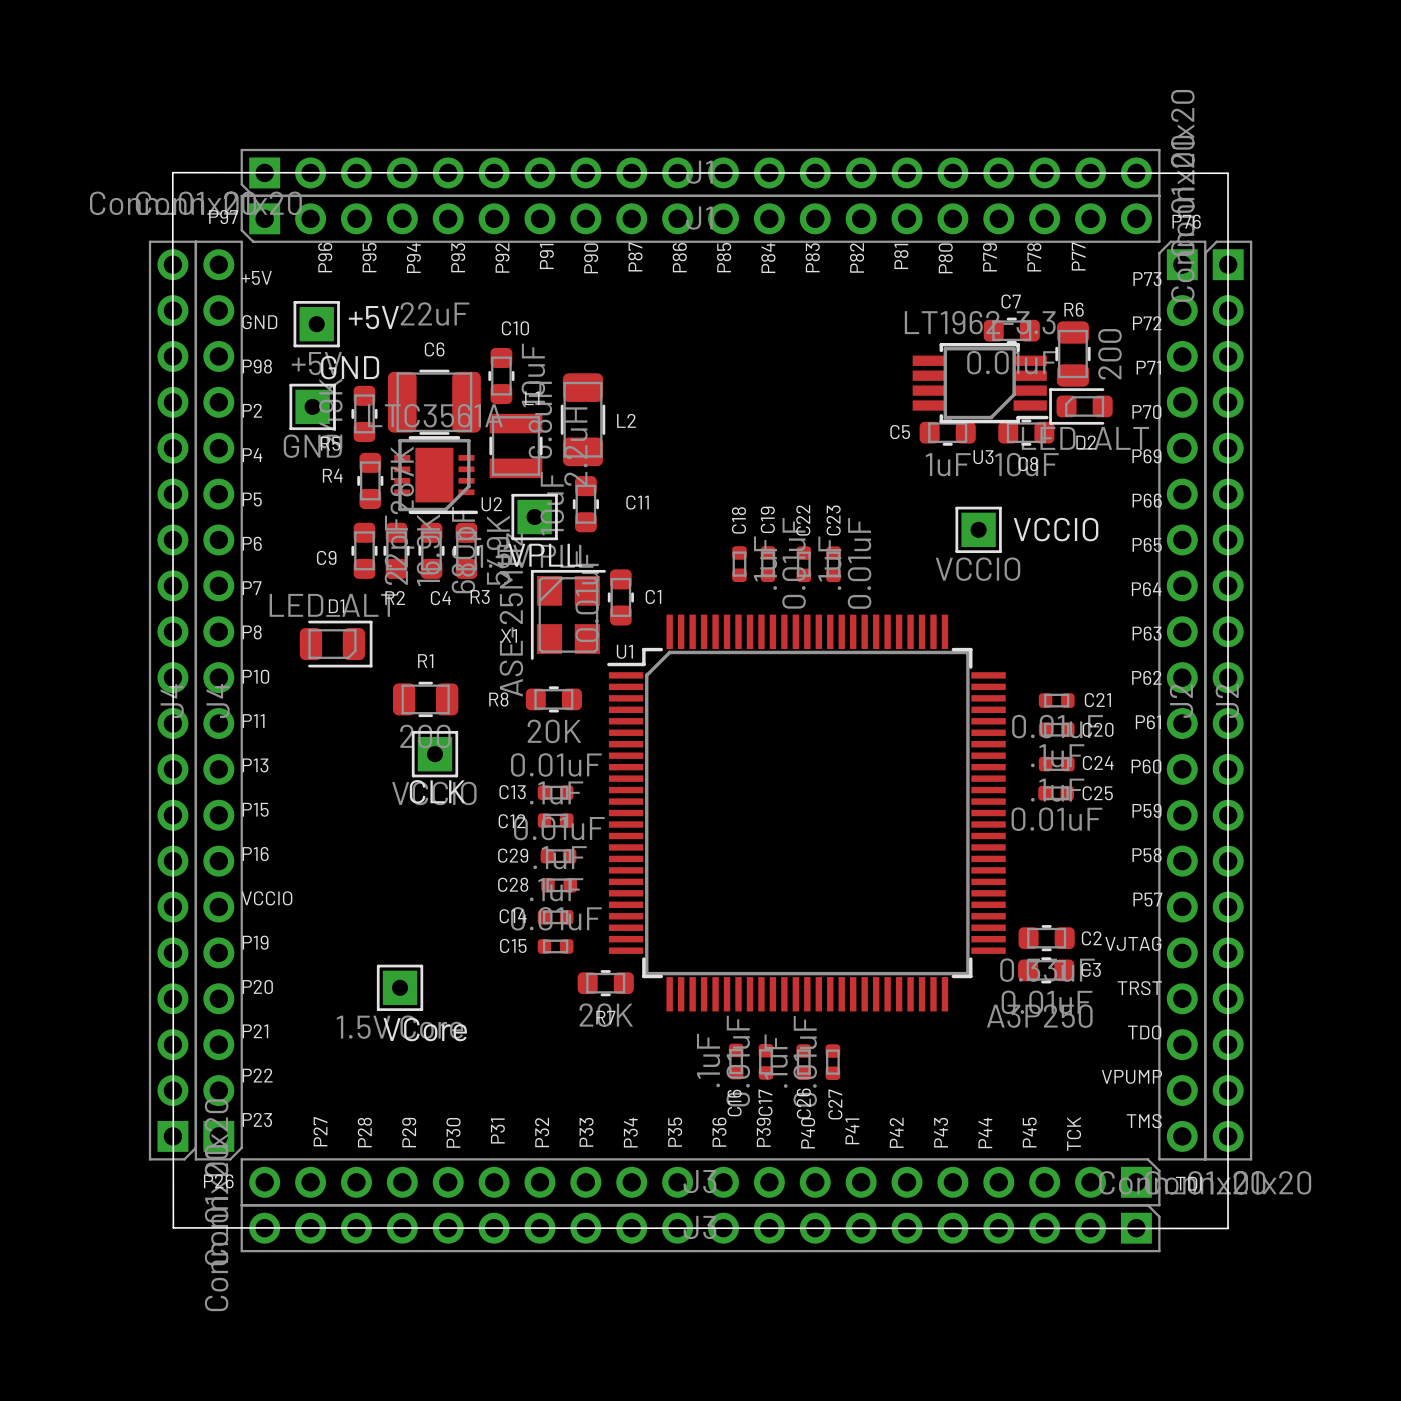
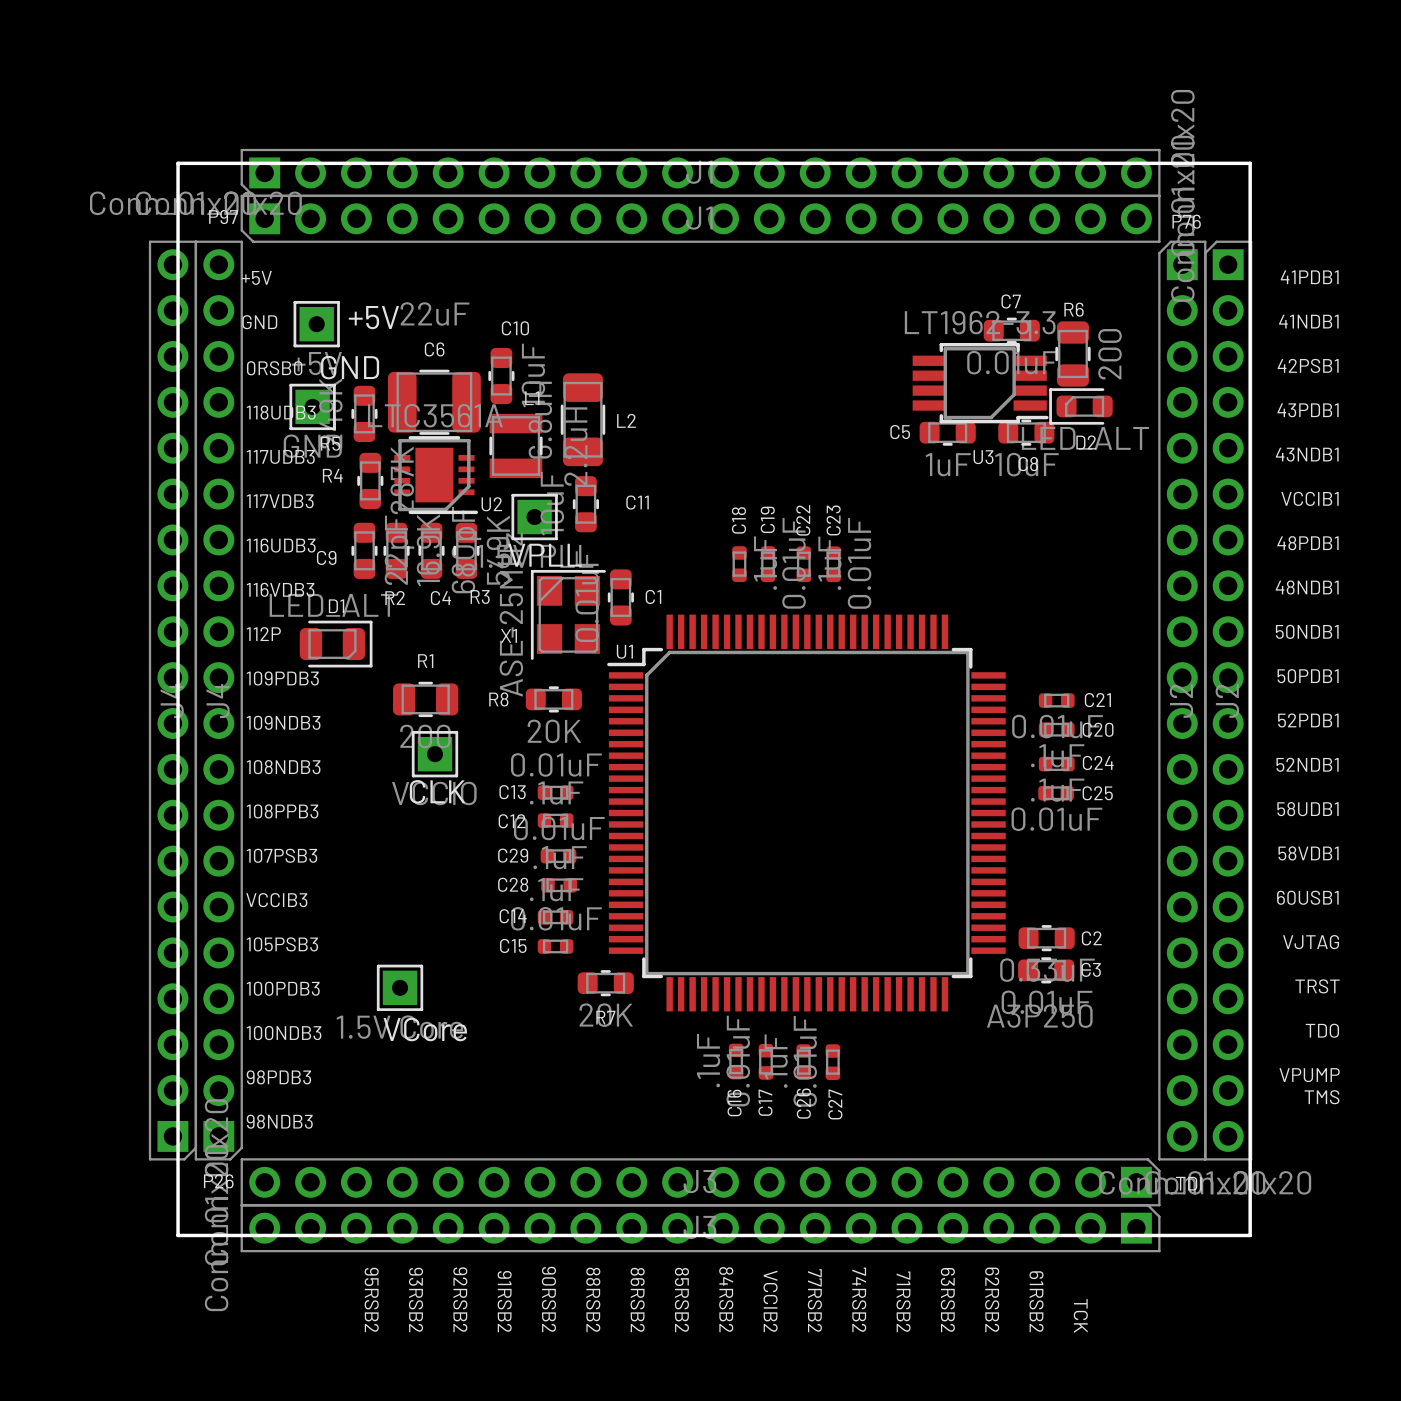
board edge: (172, 172) (173, 1227) (1228, 1228) (1228, 173) (172, 172) -> (178, 163) (178, 1235) (1250, 1235) (1250, 163) (178, 163)
text: P91 (546, 256) -> none
text: P87 (635, 256) -> none
text: P81 (901, 256) -> none
text: P77 (1078, 256) -> none
text: P96 (325, 257) -> none
text: P95 (369, 257) -> none
text: P93 (458, 257) -> none
text: P92 (502, 257) -> none
text: P86 (679, 257) -> none
text: P85 (724, 257) -> none
text: P83 (812, 257) -> none
text: P82 (857, 257) -> none
text: P79 (990, 257) -> none
text: P78 (1034, 257) -> none
text: P94 (413, 258) -> none
text: P90 (591, 258) -> none
text: P84 (768, 258) -> none
text: P80 (945, 258) -> none
text: none -> 41PDB1 (1309, 277)
text: P73 (1147, 279) -> none
text: none -> 41NDB1 (1308, 321)
text: P72 (1147, 323) -> none
text: none -> 42PSB1 (1308, 365)
text: P98 (257, 366) -> 0RSB0 (274, 368)
text: P71 (1148, 367) -> none
text: P2 (252, 410) -> 118UDB3 (281, 412)
text: none -> 43PDB1 (1308, 410)
text: P70 (1146, 411) -> none
text: none -> 43NDB1 (1307, 454)
text: P4 (252, 455) -> 117UDB3 (280, 456)
text: P69 (1146, 456) -> none
text: none -> VCCIB1 (1310, 498)
text: P5 (252, 499) -> 117VDB3 (280, 501)
text: P66 (1147, 500) -> none
VCCIO: VCCIO (978, 529) -> none
text: P6 (252, 543) -> 116UDB3 (281, 545)
text: none -> 48PDB1 (1308, 543)
text: P65 (1147, 544) -> none
text: none -> 48NDB1 (1307, 587)
text: P7 (252, 588) -> 116VDB3 (280, 589)
text: P64 (1146, 589) -> none
text: none -> 50NDB1 (1307, 631)
text: P8 (252, 632) -> 112P (263, 634)
text: P63 (1147, 633) -> none
text: P10 (255, 676) -> 109PDB3 (282, 678)
text: none -> 50PDB1 (1308, 676)
text: P62 (1146, 677) -> none
text: none -> 52PDB1 (1308, 720)
text: P11 (253, 721) -> 109NDB3 (283, 722)
text: P61 (1148, 722) -> none
text: none -> 52NDB1 (1307, 764)
text: P13 (255, 765) -> 108NDB3 (283, 767)
text: P60 (1146, 766) -> none
text: P15 (255, 809) -> 108PPB3 (282, 811)
text: none -> 58UDB1 (1307, 809)
text: P59 (1146, 810) -> none
text: none -> 58VDB1 (1308, 853)
text: P16 (255, 854) -> 107PSB3 (281, 855)
text: P58 (1147, 855) -> none
text: none -> 60USB1 (1307, 897)
text: VCCIO (266, 898) -> VCCIB3 (276, 900)
text: P57 (1147, 899) -> none
text: P19 (255, 942) -> 105PSB3 (282, 944)
text position: VJTAG (1133, 943) -> VJTAG (1311, 942)
text: P20 (257, 986) -> 100PDB3 (283, 988)
text position: TRST (1139, 988) -> TRST (1317, 986)
text: P21 (255, 1031) -> 100NDB3 (284, 1033)
text position: TDO (1144, 1032) -> TDO (1322, 1030)
text: P22 (257, 1075) -> 98PDB3 (278, 1077)
text position: VPUMP (1131, 1076) -> VPUMP (1309, 1075)
text: P23 (257, 1119) -> 98NDB3 (279, 1121)
text position: TMS (1144, 1121) -> TMS (1322, 1097)
text: P31 (497, 1130) -> none
text: P27 (320, 1131) -> none
text: P41 (852, 1131) -> none
text: P28 (364, 1132) -> none
text: P29 (409, 1132) -> none
text: P30 (453, 1132) -> none
text: P32 (542, 1132) -> none
text: P33 (586, 1132) -> none
text: P34 (630, 1132) -> none
text: P35 (675, 1132) -> none
text: P36 (719, 1132) -> none
text: P39 (763, 1132) -> none
text: P42 (896, 1132) -> none
text: P43 (941, 1132) -> none
text: P45 (1029, 1132) -> none
text: P40 (808, 1133) -> none
text: P44 (985, 1133) -> none
text rotation: 0° (1074, 1134) -> 180° (1080, 1315)
text position: TCK (1074, 1134) -> TCK (1080, 1315)
text: none -> 95RSB2 (371, 1299)
text: none -> 93RSB2 (416, 1299)
text: none -> 92RSB2 (460, 1299)
text: none -> 90RSB2 (548, 1299)
text: none -> 88RSB2 (593, 1299)
text: none -> 84RSB2 (726, 1299)
text: none -> 74RSB2 (859, 1299)
text: none -> 62RSB2 (992, 1299)
text: none -> 86RSB2 (637, 1300)
text: none -> 85RSB2 (681, 1300)
text: none -> 77RSB2 (814, 1300)
text: none -> 63RSB2 (947, 1300)
text: none -> 91RSB2 (504, 1301)
text: none -> VCCIB2 (770, 1301)
text: none -> 71RSB2 (903, 1301)
text: none -> 61RSB2 (1036, 1301)

